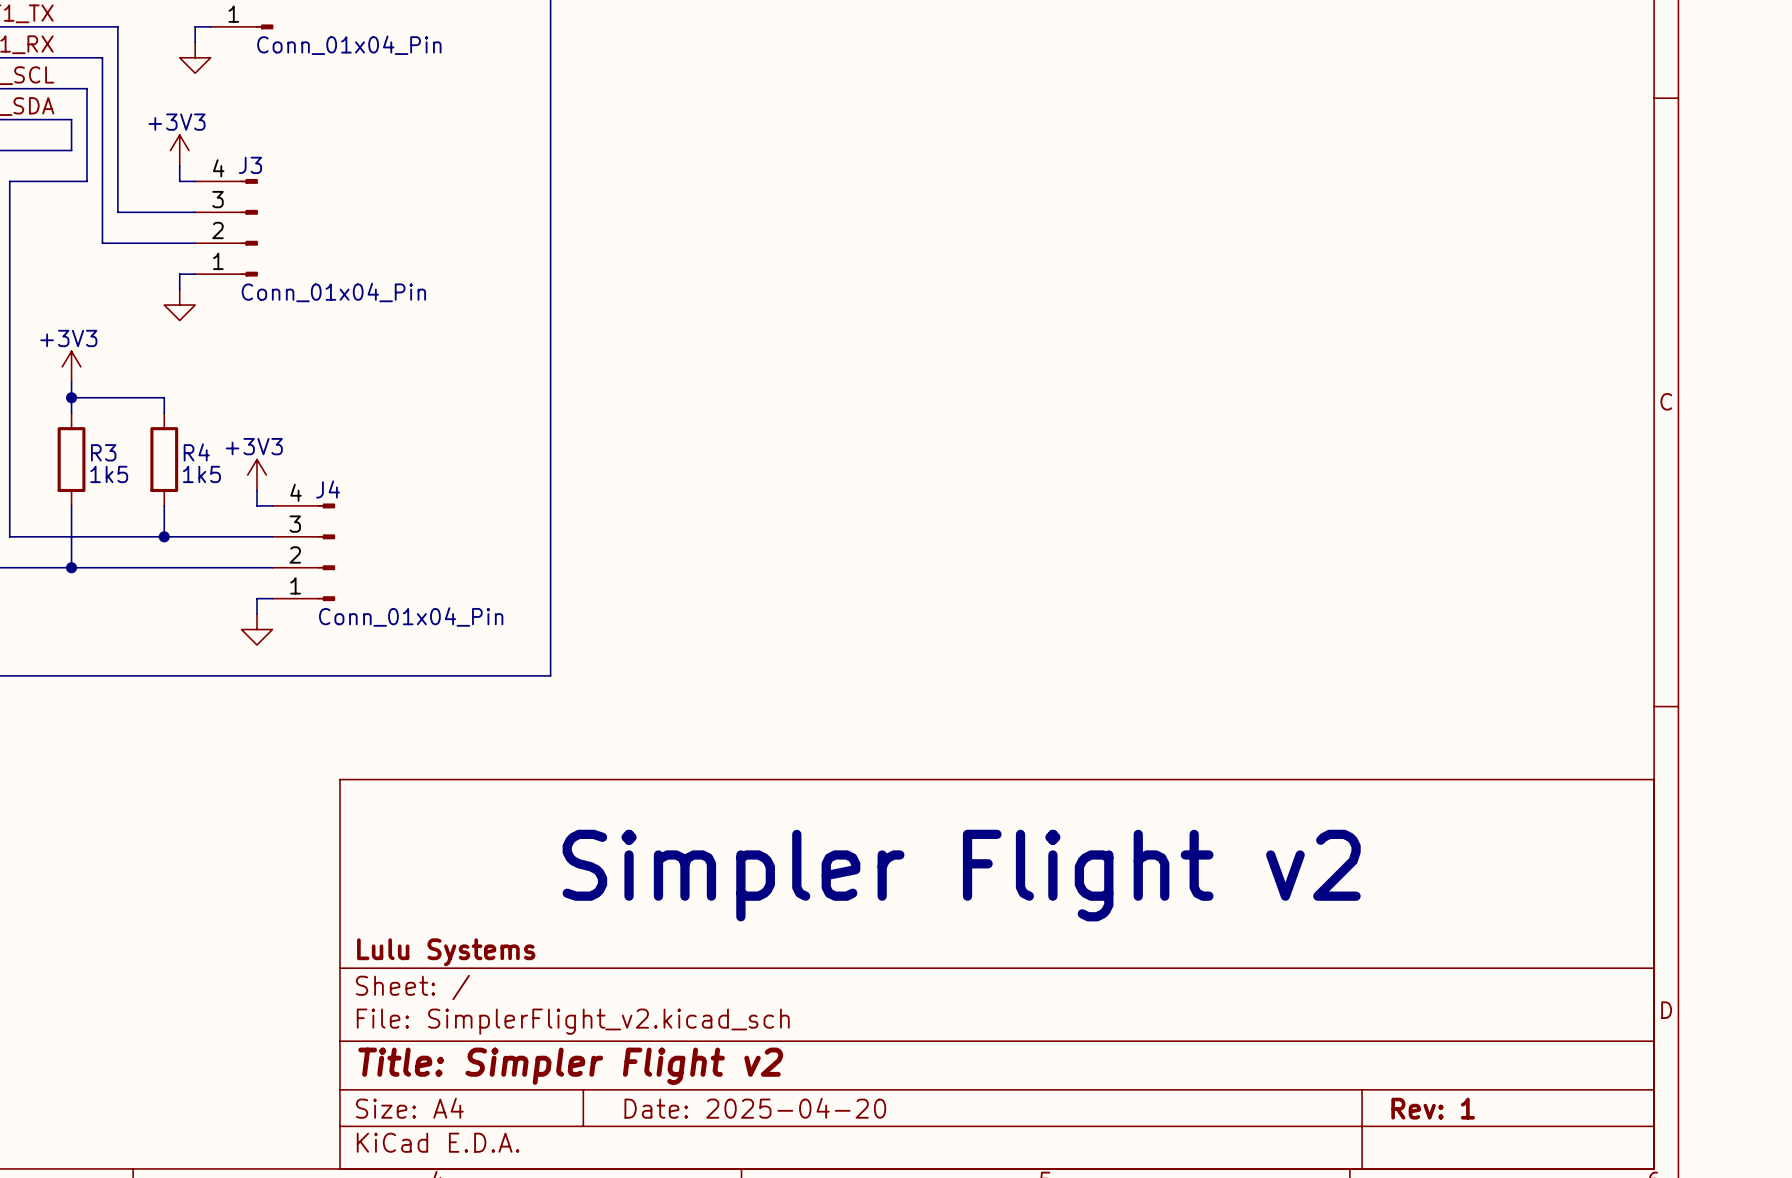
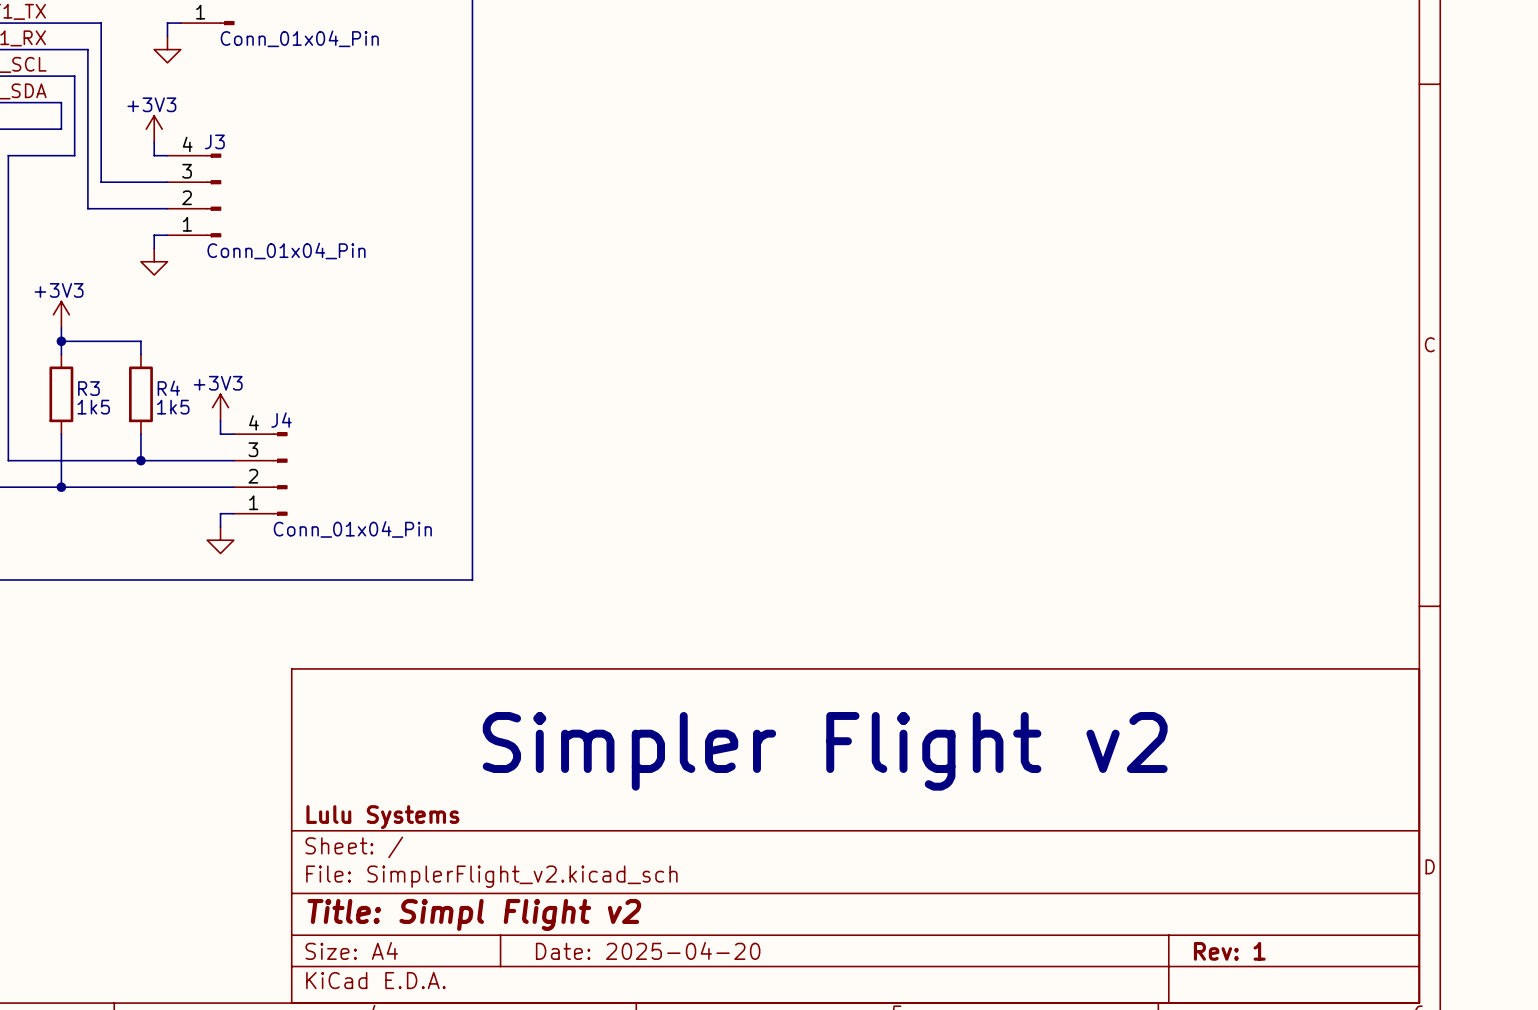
title block: Title: Simpler Flight v2 (570, 1066) -> Title: Simpl Flight v2 (474, 914)

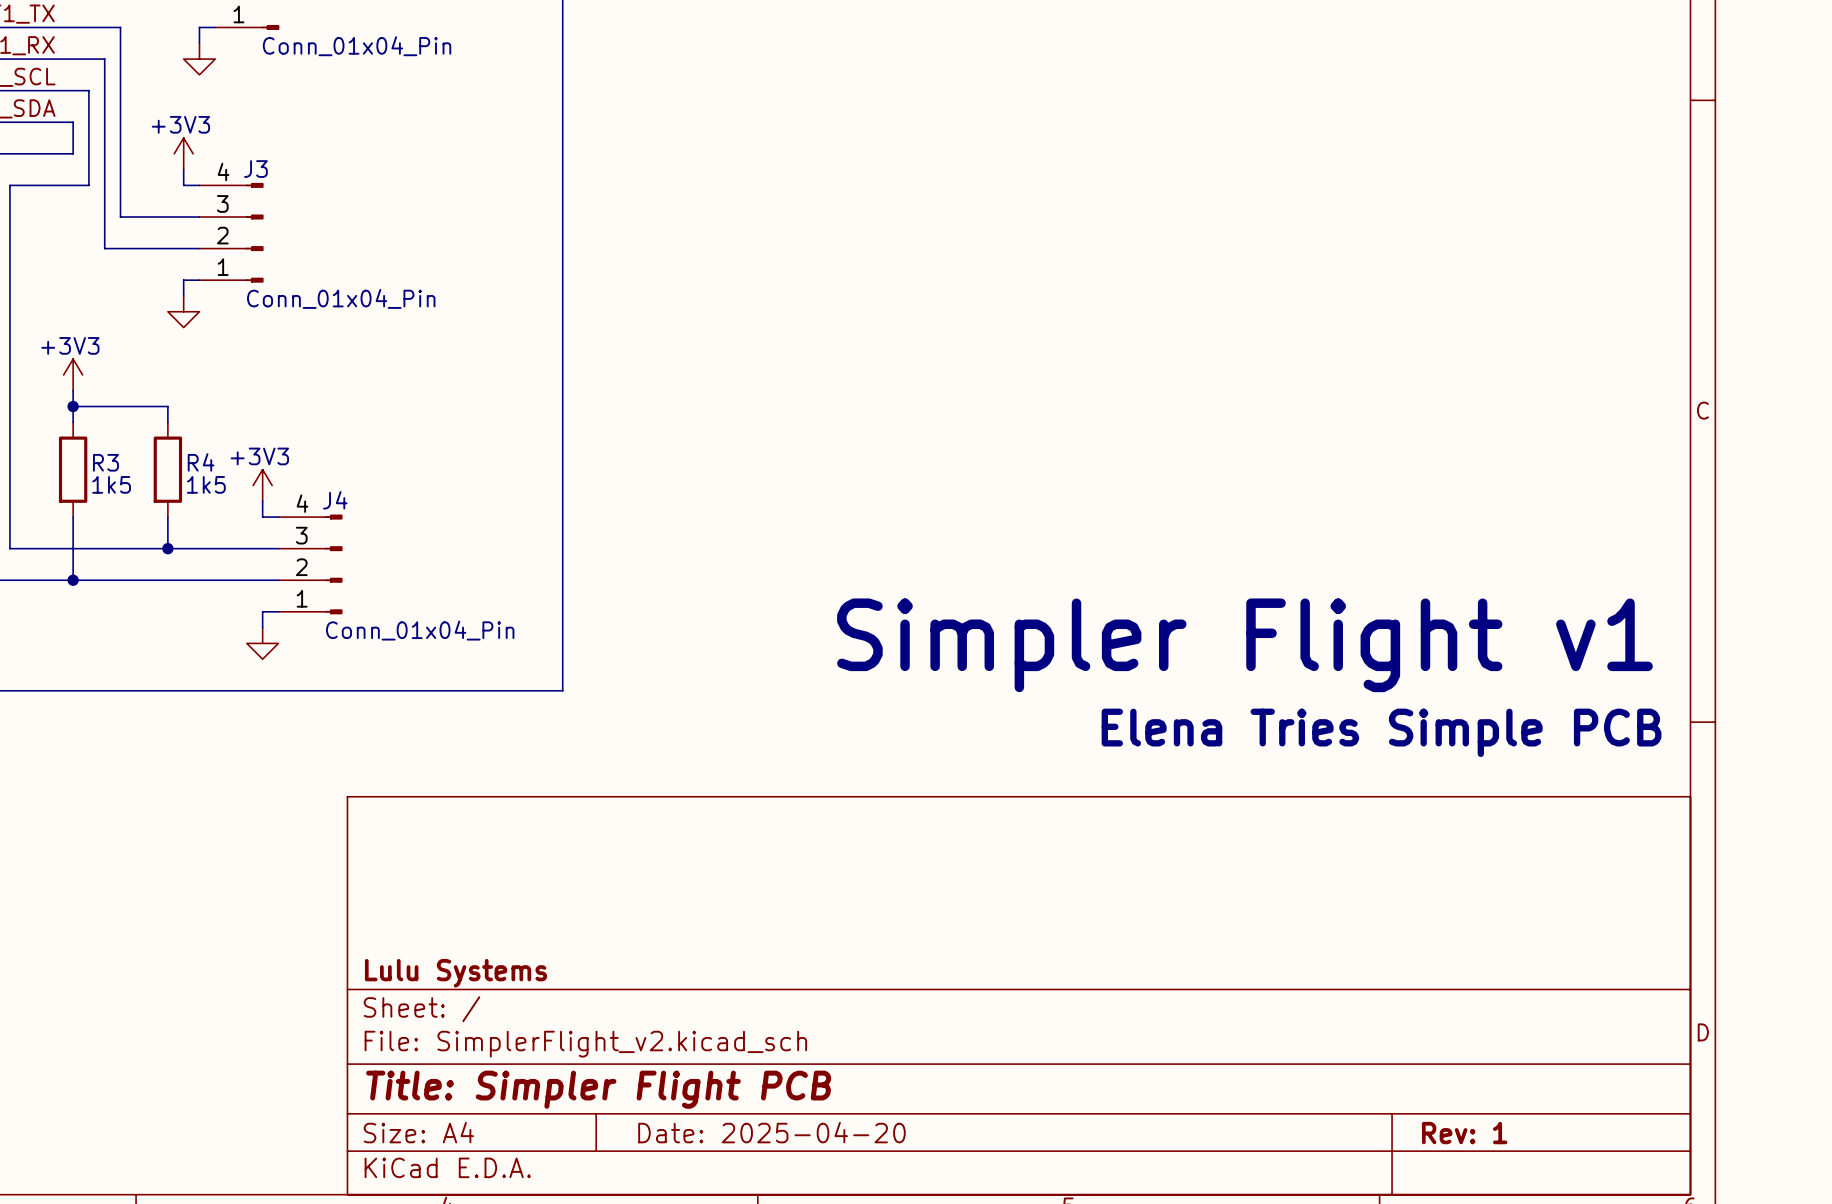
text: none -> Simpler Flight v1 (1244, 645)
text: none -> Elena Tries Simple PCB (1381, 732)
text: Simpler Flight v2 (825, 751) -> none
title block: Title: Simpl Flight v2 (474, 914) -> Title: Simpler Flight PCB (598, 1089)

